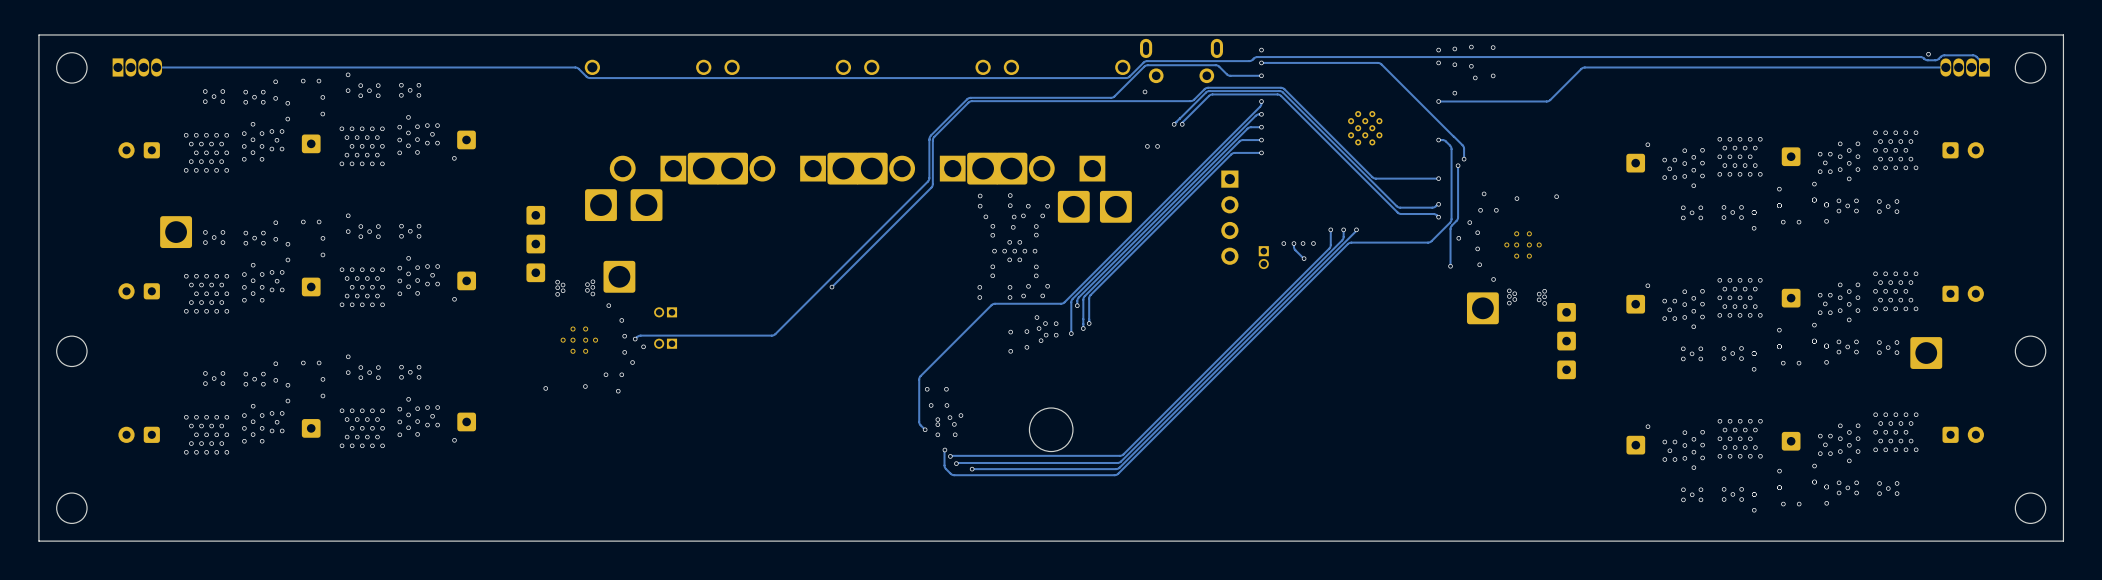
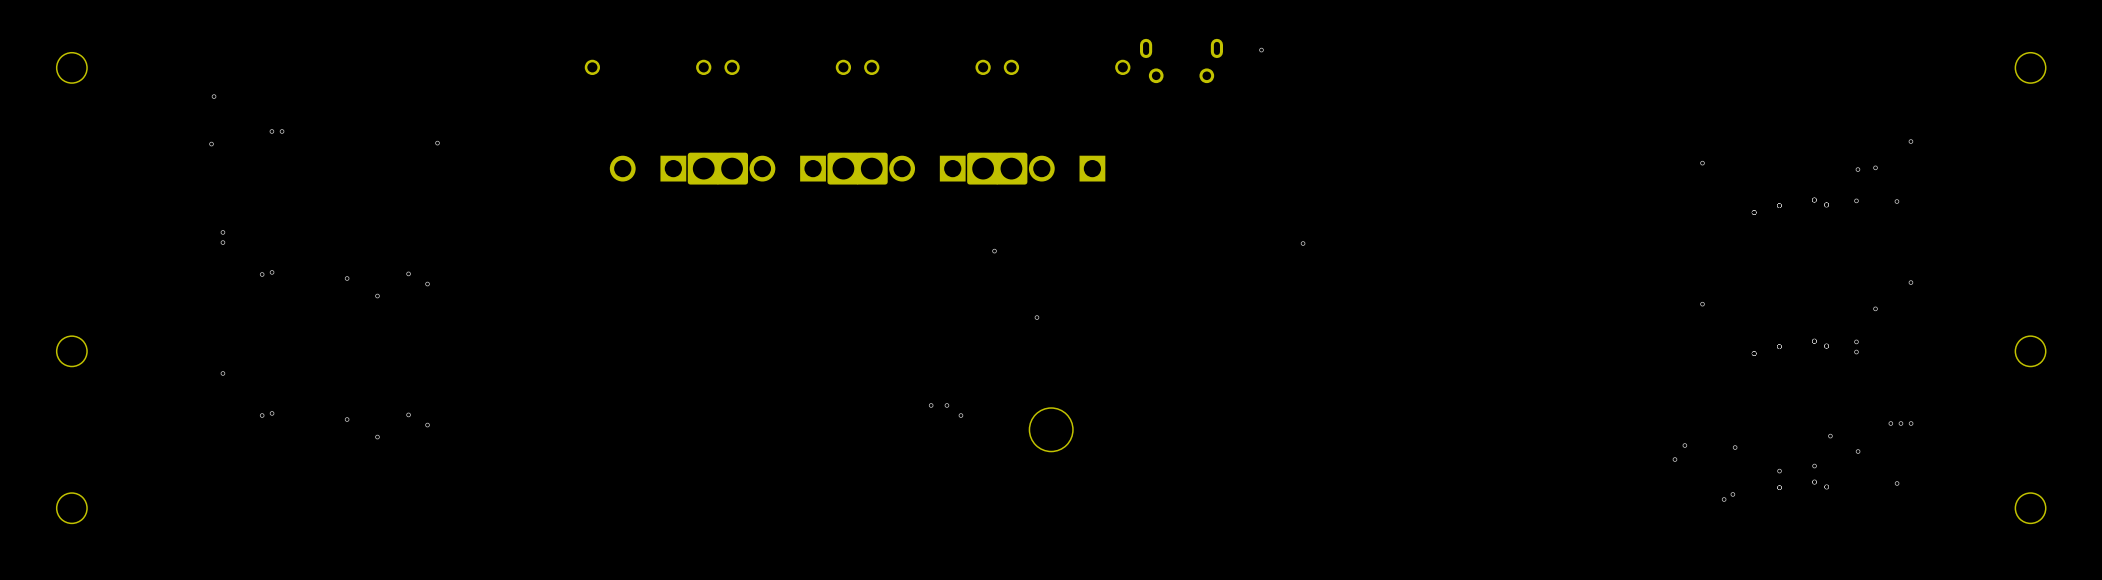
board edge: (2063, 34) (38, 34) (38, 541) (2063, 541) (2063, 34) -> none
via: (1471, 47) -> none
via: (1493, 47) -> none
via: (1454, 48) -> none
via: (1438, 50) -> none
via: (1928, 54) -> none
track: (1261, 62) (1379, 63) (1462, 145) (1464, 159) -> none
via: (1261, 62) -> none
via: (1438, 62) -> none
via: (1454, 64) -> none
via: (1471, 66) -> none
part: (137, 67) -> none
track: (1945, 67) (1584, 67) (1547, 101) (1438, 101) -> none
part: (1965, 67) -> none
track: (1984, 67) (1982, 63) (1972, 55) (1943, 55) (1935, 60) (1926, 60) (1920, 57) (1257, 57) (1249, 61) (1146, 61) (1126, 78) (590, 78) (575, 67) (156, 67) -> none
via: (348, 74) -> none
track: (1261, 75) (1229, 75) (1216, 65) (1147, 65) (1112, 97) (970, 97) (931, 135) (929, 139) -> none
via: (1261, 75) -> none
via: (1493, 75) -> none
via: (1475, 77) -> none
via: (275, 81) -> none
via: (303, 81) -> none
via: (318, 81) -> none
via: (360, 85) -> none
via: (378, 85) -> none
via: (401, 85) -> none
via: (418, 85) -> none
via: (348, 90) -> none
via: (369, 90) -> none
via: (410, 90) -> none
via: (205, 91) -> none
via: (222, 91) -> none
via: (1145, 91) -> none
via: (245, 92) -> none
via: (263, 92) -> none
via: (1454, 93) -> none
via: (360, 95) -> none
via: (378, 95) -> none
via: (401, 95) -> none
via: (418, 95) -> none
via: (254, 97) -> none
via: (322, 97) -> none
via: (275, 98) -> none
via: (205, 101) -> none
via: (222, 101) -> none
track: (1261, 101) (1260, 106) (1064, 302) (991, 305) (919, 377) (919, 422) (925, 429) -> none
via: (1261, 101) -> none
via: (1438, 101) -> none
via: (245, 102) -> none
via: (263, 102) -> none
via: (287, 103) -> none
via: (322, 114) -> none
track: (1261, 114) (1255, 115) (1072, 299) (1071, 333) -> none
via: (1261, 114) -> none
via: (408, 117) -> none
via: (287, 119) -> none
via: (253, 124) -> none
track: (1174, 124) (1208, 91) (1280, 91) (1397, 206) (1432, 207) (1437, 204) -> none
via: (1174, 124) -> none
track: (1182, 124) (1211, 94) (1279, 94) (1398, 212) (1433, 214) (1438, 217) -> none
via: (1182, 124) -> none
via: (427, 125) -> none
via: (437, 125) -> none
via: (417, 126) -> none
via: (399, 127) -> none
track: (1261, 127) (1247, 128) (1078, 297) (1077, 305) -> none
via: (1261, 127) -> none
via: (341, 128) -> none
via: (352, 128) -> none
via: (362, 128) -> none
via: (372, 128) -> none
via: (382, 128) -> none
part: (1365, 128) -> none
via: (408, 132) -> none
via: (1875, 132) -> none
via: (1885, 132) -> none
via: (1895, 132) -> none
via: (1905, 132) -> none
via: (1916, 132) -> none
via: (244, 133) -> none
via: (262, 133) -> none
via: (432, 134) -> none
via: (186, 135) -> none
via: (196, 135) -> none
via: (206, 135) -> none
via: (216, 135) -> none
via: (226, 135) -> none
via: (346, 137) -> none
via: (357, 137) -> none
via: (367, 137) -> none
via: (377, 137) -> none
via: (252, 139) -> none
via: (417, 139) -> none
part: (466, 139) -> none
track: (929, 139) (928, 181) (774, 334) (640, 335) (635, 339) -> none
via: (1719, 139) -> none
via: (1729, 139) -> none
via: (1740, 139) -> none
via: (1750, 139) -> none
via: (1760, 139) -> none
via: (276, 140) -> none
via: (399, 140) -> none
track: (1261, 140) (1239, 141) (1084, 296) (1083, 328) -> none
via: (1261, 140) -> none
track: (1438, 140) (1445, 140) (1451, 148) (1450, 222) (1429, 242) (1348, 243) (1117, 474) (953, 475) (944, 467) (944, 450) -> none
via: (1438, 140) -> none
via: (1880, 141) -> none
via: (1890, 141) -> none
via: (1900, 141) -> none
part: (311, 143) -> none
via: (427, 143) -> none
via: (1840, 143) -> none
via: (1857, 143) -> none
via: (191, 144) -> none
via: (201, 144) -> none
via: (221, 144) -> none
via: (1647, 144) -> none
via: (408, 145) -> none
via: (244, 146) -> none
via: (262, 146) -> none
via: (352, 146) -> none
via: (362, 146) -> none
via: (372, 146) -> none
via: (382, 146) -> none
via: (1147, 146) -> none
via: (1157, 146) -> none
via: (1724, 148) -> none
via: (1734, 148) -> none
via: (1745, 148) -> none
via: (1755, 148) -> none
via: (271, 149) -> none
via: (282, 149) -> none
part: (139, 150) -> none
via: (1684, 150) -> none
via: (1702, 150) -> none
via: (1849, 150) -> none
via: (1875, 150) -> none
via: (1885, 150) -> none
via: (1895, 150) -> none
via: (1905, 150) -> none
part: (1963, 150) -> none
via: (196, 152) -> none
via: (206, 152) -> none
via: (216, 152) -> none
via: (226, 152) -> none
via: (252, 152) -> none
via: (399, 152) -> none
via: (417, 152) -> none
track: (1261, 152) (1231, 154) (1090, 295) (1089, 323) -> none
via: (1261, 152) -> none
via: (1820, 154) -> none
via: (1830, 154) -> none
via: (346, 155) -> none
via: (357, 155) -> none
via: (367, 155) -> none
via: (377, 155) -> none
via: (1719, 156) -> none
via: (1729, 156) -> none
via: (1740, 156) -> none
via: (1750, 156) -> none
part: (1791, 156) -> none
via: (1840, 156) -> none
via: (1857, 156) -> none
via: (1693, 157) -> none
via: (454, 158) -> none
via: (244, 159) -> none
via: (262, 159) -> none
via: (1464, 159) -> none
via: (1880, 159) -> none
via: (1890, 159) -> none
via: (1900, 159) -> none
via: (1910, 159) -> none
via: (1664, 160) -> none
via: (1674, 160) -> none
via: (191, 161) -> none
via: (201, 161) -> none
via: (211, 161) -> none
via: (221, 161) -> none
via: (1825, 162) -> none
via: (341, 163) -> none
via: (352, 163) -> none
via: (362, 163) -> none
via: (372, 163) -> none
via: (382, 163) -> none
part: (1635, 163) -> none
via: (1684, 163) -> none
via: (1849, 163) -> none
track: (1458, 165) (1458, 217) (1450, 228) (1450, 266) -> none
via: (1458, 165) -> none
via: (1724, 165) -> none
via: (1734, 165) -> none
via: (1745, 165) -> none
via: (1755, 165) -> none
via: (1885, 167) -> none
via: (1895, 167) -> none
via: (1905, 167) -> none
via: (1916, 167) -> none
via: (1669, 168) -> none
via: (1840, 169) -> none
via: (186, 170) -> none
via: (196, 170) -> none
via: (206, 170) -> none
via: (216, 170) -> none
via: (226, 170) -> none
via: (1693, 170) -> none
via: (1820, 171) -> none
via: (1830, 171) -> none
via: (1719, 174) -> none
via: (1729, 174) -> none
via: (1740, 174) -> none
via: (1750, 174) -> none
via: (1760, 174) -> none
via: (1684, 176) -> none
via: (1702, 176) -> none
via: (1664, 177) -> none
via: (1674, 177) -> none
track: (1438, 178) (1373, 177) (1281, 87) (1207, 87) (1190, 101) (971, 101) (933, 138) (931, 187) (831, 287) -> none
via: (1438, 178) -> none
via: (1849, 178) -> none
via: (1814, 184) -> none
via: (1693, 185) -> none
via: (1779, 189) -> none
via: (1484, 193) -> none
via: (1010, 195) -> none
via: (980, 196) -> none
via: (1556, 196) -> none
via: (1516, 198) -> none
via: (1838, 200) -> none
via: (1879, 201) -> none
via: (1438, 204) -> none
part: (600, 205) -> none
part: (646, 205) -> none
via: (1010, 205) -> none
via: (1847, 205) -> none
via: (980, 206) -> none
via: (1028, 206) -> none
via: (1047, 206) -> none
part: (1073, 206) -> none
part: (1115, 206) -> none
via: (1888, 206) -> none
via: (1683, 207) -> none
via: (1700, 207) -> none
via: (1723, 207) -> none
via: (1741, 207) -> none
via: (1480, 210) -> none
via: (1496, 210) -> none
via: (1838, 211) -> none
via: (1856, 211) -> none
via: (1879, 211) -> none
via: (1896, 211) -> none
via: (1692, 212) -> none
via: (1732, 212) -> none
via: (348, 215) -> none
part: (535, 215) -> none
via: (1023, 215) -> none
via: (1042, 215) -> none
via: (985, 216) -> none
via: (1014, 216) -> none
part: (1229, 217) -> none
via: (1438, 217) -> none
via: (1683, 217) -> none
via: (1700, 217) -> none
via: (1723, 217) -> none
via: (1741, 217) -> none
via: (303, 221) -> none
via: (319, 221) -> none
via: (1826, 221) -> none
via: (275, 222) -> none
via: (1469, 222) -> none
via: (1783, 222) -> none
via: (1799, 222) -> none
via: (360, 226) -> none
via: (378, 226) -> none
via: (401, 226) -> none
via: (419, 226) -> none
via: (992, 226) -> none
via: (1036, 226) -> none
via: (1013, 227) -> none
via: (1754, 228) -> none
track: (1330, 229) (1329, 248) (1122, 455) (950, 456) -> none
via: (1330, 229) -> none
track: (1343, 229) (1342, 240) (1120, 462) (956, 463) -> none
via: (1343, 229) -> none
track: (1356, 229) (1118, 468) (972, 469) -> none
via: (1356, 229) -> none
via: (348, 231) -> none
via: (369, 231) -> none
via: (410, 231) -> none
part: (176, 232) -> none
via: (205, 232) -> none
via: (1477, 232) -> none
via: (245, 233) -> none
via: (263, 233) -> none
via: (992, 235) -> none
via: (1036, 235) -> none
via: (360, 236) -> none
via: (378, 236) -> none
via: (401, 236) -> none
via: (419, 236) -> none
via: (214, 237) -> none
via: (254, 238) -> none
via: (322, 238) -> none
via: (1458, 238) -> none
via: (275, 239) -> none
via: (205, 242) -> none
via: (1009, 242) -> none
via: (1019, 242) -> none
via: (245, 243) -> none
via: (263, 243) -> none
via: (1283, 243) -> none
track: (1293, 243) (1295, 249) (1304, 258) -> none
via: (1293, 243) -> none
via: (1313, 243) -> none
via: (287, 244) -> none
part: (535, 244) -> none
part: (1523, 244) -> none
via: (1477, 248) -> none
via: (1004, 251) -> none
via: (1014, 251) -> none
via: (1024, 251) -> none
via: (1035, 251) -> none
via: (322, 254) -> none
part: (1263, 257) -> none
via: (408, 258) -> none
via: (1304, 258) -> none
via: (287, 259) -> none
via: (1009, 259) -> none
via: (1019, 259) -> none
via: (1479, 264) -> none
via: (253, 265) -> none
via: (427, 266) -> none
via: (437, 266) -> none
via: (992, 266) -> none
via: (1036, 266) -> none
via: (1450, 266) -> none
via: (417, 267) -> none
via: (399, 268) -> none
via: (342, 269) -> none
via: (352, 269) -> none
via: (362, 269) -> none
via: (372, 269) -> none
via: (382, 269) -> none
via: (282, 272) -> none
part: (535, 272) -> none
via: (1875, 273) -> none
via: (1885, 273) -> none
via: (1895, 273) -> none
via: (1905, 273) -> none
via: (1916, 273) -> none
via: (244, 274) -> none
via: (432, 275) -> none
via: (992, 275) -> none
via: (1036, 275) -> none
via: (186, 276) -> none
via: (196, 276) -> none
via: (206, 276) -> none
via: (216, 276) -> none
via: (226, 276) -> none
part: (619, 276) -> none
via: (357, 278) -> none
via: (367, 278) -> none
via: (377, 278) -> none
via: (1493, 279) -> none
via: (253, 280) -> none
via: (399, 280) -> none
via: (417, 280) -> none
part: (466, 280) -> none
via: (1719, 280) -> none
via: (1729, 280) -> none
via: (1740, 280) -> none
via: (1750, 280) -> none
via: (1760, 280) -> none
via: (277, 281) -> none
via: (592, 281) -> none
via: (557, 282) -> none
via: (1880, 282) -> none
via: (1890, 282) -> none
via: (1900, 282) -> none
via: (437, 284) -> none
via: (563, 284) -> none
via: (587, 284) -> none
via: (1840, 284) -> none
via: (1857, 284) -> none
via: (191, 285) -> none
via: (201, 285) -> none
via: (211, 285) -> none
via: (221, 285) -> none
via: (1647, 285) -> none
part: (311, 286) -> none
via: (408, 286) -> none
via: (1028, 286) -> none
via: (1047, 286) -> none
via: (244, 287) -> none
via: (262, 287) -> none
via: (352, 287) -> none
via: (362, 287) -> none
via: (372, 287) -> none
via: (382, 287) -> none
via: (557, 287) -> none
via: (592, 287) -> none
via: (831, 287) -> none
via: (979, 287) -> none
via: (1010, 287) -> none
via: (272, 289) -> none
via: (282, 289) -> none
via: (1724, 289) -> none
via: (1734, 289) -> none
via: (1745, 289) -> none
via: (1755, 289) -> none
via: (563, 290) -> none
via: (587, 290) -> none
via: (1509, 290) -> none
part: (139, 291) -> none
via: (1544, 291) -> none
via: (1684, 291) -> none
via: (1702, 291) -> none
via: (1849, 291) -> none
via: (1875, 291) -> none
via: (1885, 291) -> none
via: (1895, 291) -> none
via: (1905, 291) -> none
via: (196, 293) -> none
via: (206, 293) -> none
via: (216, 293) -> none
via: (226, 293) -> none
via: (253, 293) -> none
via: (399, 293) -> none
via: (417, 293) -> none
via: (592, 293) -> none
via: (1514, 293) -> none
part: (1963, 293) -> none
via: (557, 294) -> none
via: (1539, 294) -> none
via: (1042, 295) -> none
via: (1820, 295) -> none
via: (1830, 295) -> none
via: (347, 296) -> none
via: (357, 296) -> none
via: (367, 296) -> none
via: (1023, 296) -> none
via: (1509, 296) -> none
via: (1544, 296) -> none
via: (979, 297) -> none
via: (1010, 297) -> none
via: (1719, 297) -> none
via: (1729, 297) -> none
via: (1740, 297) -> none
via: (1750, 297) -> none
via: (1840, 297) -> none
via: (1857, 297) -> none
via: (1693, 298) -> none
part: (1791, 298) -> none
via: (454, 299) -> none
via: (1514, 299) -> none
via: (1539, 299) -> none
via: (244, 300) -> none
via: (262, 300) -> none
via: (1880, 300) -> none
via: (1890, 300) -> none
via: (1900, 300) -> none
via: (1910, 300) -> none
via: (1664, 301) -> none
via: (1674, 301) -> none
via: (191, 302) -> none
via: (201, 302) -> none
via: (211, 302) -> none
via: (221, 302) -> none
via: (1509, 303) -> none
via: (1544, 303) -> none
via: (1825, 303) -> none
via: (342, 304) -> none
via: (352, 304) -> none
via: (362, 304) -> none
via: (372, 304) -> none
via: (382, 304) -> none
part: (1635, 304) -> none
via: (1684, 304) -> none
via: (1849, 304) -> none
via: (608, 305) -> none
via: (1077, 305) -> none
via: (1724, 306) -> none
via: (1734, 306) -> none
via: (1745, 306) -> none
via: (1755, 306) -> none
part: (1482, 308) -> none
via: (1885, 308) -> none
via: (1895, 308) -> none
via: (1905, 308) -> none
via: (1916, 308) -> none
via: (1669, 309) -> none
via: (1840, 310) -> none
via: (1857, 310) -> none
via: (186, 311) -> none
via: (196, 311) -> none
via: (206, 311) -> none
via: (216, 311) -> none
via: (226, 311) -> none
via: (1693, 311) -> none
part: (665, 312) -> none
part: (1566, 312) -> none
via: (1820, 312) -> none
via: (1830, 312) -> none
via: (1719, 315) -> none
via: (1729, 315) -> none
via: (1740, 315) -> none
via: (1750, 315) -> none
via: (1760, 315) -> none
via: (1684, 317) -> none
via: (1702, 317) -> none
via: (1664, 318) -> none
via: (1674, 318) -> none
via: (1849, 319) -> none
via: (621, 320) -> none
via: (1045, 323) -> none
via: (1056, 323) -> none
via: (1089, 323) -> none
via: (1814, 325) -> none
via: (1693, 326) -> none
via: (1039, 328) -> none
via: (1083, 328) -> none
via: (1779, 330) -> none
via: (1026, 331) -> none
via: (1010, 332) -> none
via: (1071, 333) -> none
via: (1046, 335) -> none
via: (1056, 335) -> none
via: (624, 336) -> none
via: (635, 339) -> none
part: (579, 340) -> none
via: (1041, 340) -> none
part: (1566, 341) -> none
via: (1838, 341) -> none
via: (1879, 342) -> none
via: (1896, 342) -> none
part: (665, 343) -> none
via: (643, 346) -> none
via: (1847, 346) -> none
via: (1026, 347) -> none
via: (1888, 347) -> none
via: (1683, 348) -> none
via: (1700, 348) -> none
via: (1723, 348) -> none
via: (1741, 348) -> none
via: (1010, 351) -> none
via: (624, 352) -> none
via: (1838, 352) -> none
via: (1879, 352) -> none
via: (1896, 352) -> none
via: (1692, 353) -> none
via: (1732, 353) -> none
part: (1926, 353) -> none
via: (348, 356) -> none
via: (1683, 358) -> none
via: (1700, 358) -> none
via: (1723, 358) -> none
via: (1741, 358) -> none
via: (303, 362) -> none
via: (319, 362) -> none
via: (632, 362) -> none
via: (1826, 362) -> none
via: (275, 363) -> none
via: (1783, 363) -> none
via: (1799, 363) -> none
via: (360, 367) -> none
via: (378, 367) -> none
via: (401, 367) -> none
via: (419, 367) -> none
part: (1566, 369) -> none
via: (1754, 369) -> none
via: (348, 372) -> none
via: (369, 372) -> none
via: (410, 372) -> none
via: (205, 373) -> none
via: (245, 374) -> none
via: (263, 374) -> none
via: (606, 374) -> none
via: (621, 374) -> none
via: (360, 377) -> none
via: (378, 377) -> none
via: (401, 377) -> none
via: (419, 377) -> none
via: (214, 378) -> none
via: (254, 379) -> none
via: (322, 379) -> none
via: (275, 380) -> none
via: (205, 383) -> none
via: (222, 383) -> none
via: (245, 384) -> none
via: (263, 384) -> none
via: (287, 385) -> none
via: (585, 386) -> none
via: (545, 388) -> none
via: (927, 389) -> none
via: (946, 389) -> none
via: (618, 391) -> none
via: (322, 395) -> none
via: (408, 399) -> none
via: (287, 401) -> none
via: (253, 406) -> none
via: (427, 407) -> none
via: (437, 407) -> none
via: (417, 408) -> none
via: (399, 409) -> none
via: (342, 410) -> none
via: (352, 410) -> none
via: (362, 410) -> none
via: (372, 410) -> none
via: (382, 410) -> none
via: (282, 413) -> none
via: (1875, 414) -> none
via: (1885, 414) -> none
via: (1895, 414) -> none
via: (1906, 414) -> none
via: (1916, 414) -> none
via: (244, 415) -> none
via: (432, 416) -> none
via: (186, 417) -> none
via: (196, 417) -> none
via: (206, 417) -> none
via: (216, 417) -> none
via: (226, 417) -> none
via: (949, 417) -> none
via: (357, 419) -> none
via: (367, 419) -> none
via: (377, 419) -> none
via: (937, 419) -> none
via: (253, 421) -> none
via: (399, 421) -> none
via: (417, 421) -> none
part: (466, 421) -> none
via: (1719, 421) -> none
via: (1730, 421) -> none
via: (1740, 421) -> none
via: (1750, 421) -> none
via: (1760, 421) -> none
via: (277, 422) -> none
via: (1880, 423) -> none
via: (937, 424) -> none
via: (954, 424) -> none
via: (437, 425) -> none
via: (1840, 425) -> none
via: (1858, 425) -> none
via: (191, 426) -> none
via: (201, 426) -> none
via: (211, 426) -> none
via: (221, 426) -> none
via: (1647, 426) -> none
via: (408, 427) -> none
via: (244, 428) -> none
via: (262, 428) -> none
part: (311, 428) -> none
via: (352, 428) -> none
via: (362, 428) -> none
via: (372, 428) -> none
via: (382, 428) -> none
via: (925, 429) -> none
via: (272, 430) -> none
via: (282, 430) -> none
via: (1725, 430) -> none
via: (1735, 430) -> none
via: (1745, 430) -> none
via: (1755, 430) -> none
via: (1684, 432) -> none
via: (1702, 432) -> none
via: (1849, 432) -> none
via: (1875, 432) -> none
via: (1885, 432) -> none
via: (1895, 432) -> none
via: (1906, 432) -> none
part: (139, 434) -> none
via: (196, 434) -> none
via: (206, 434) -> none
via: (216, 434) -> none
via: (226, 434) -> none
via: (253, 434) -> none
via: (399, 434) -> none
via: (417, 434) -> none
via: (937, 434) -> none
via: (955, 434) -> none
part: (1963, 434) -> none
via: (1820, 436) -> none
via: (347, 437) -> none
via: (357, 437) -> none
via: (367, 437) -> none
via: (1719, 438) -> none
via: (1730, 438) -> none
via: (1740, 438) -> none
via: (1750, 438) -> none
via: (1840, 438) -> none
via: (1858, 438) -> none
via: (1693, 439) -> none
via: (454, 440) -> none
via: (244, 441) -> none
via: (262, 441) -> none
part: (1791, 441) -> none
via: (1880, 441) -> none
via: (1890, 441) -> none
via: (1900, 441) -> none
via: (1911, 441) -> none
via: (1664, 442) -> none
via: (1674, 442) -> none
via: (191, 443) -> none
via: (201, 443) -> none
via: (211, 443) -> none
via: (221, 443) -> none
via: (1825, 444) -> none
via: (342, 445) -> none
via: (352, 445) -> none
via: (362, 445) -> none
via: (372, 445) -> none
via: (382, 445) -> none
part: (1635, 445) -> none
via: (1702, 445) -> none
via: (1849, 445) -> none
via: (1725, 447) -> none
via: (1745, 447) -> none
via: (1755, 447) -> none
via: (1875, 449) -> none
via: (1885, 449) -> none
via: (1895, 449) -> none
via: (1906, 449) -> none
via: (1916, 449) -> none
via: (944, 450) -> none
via: (1669, 450) -> none
via: (1840, 451) -> none
via: (186, 452) -> none
via: (196, 452) -> none
via: (206, 452) -> none
via: (216, 452) -> none
via: (226, 452) -> none
via: (1693, 452) -> none
via: (1820, 453) -> none
via: (1830, 453) -> none
via: (950, 456) -> none
via: (1719, 456) -> none
via: (1730, 456) -> none
via: (1740, 456) -> none
via: (1750, 456) -> none
via: (1760, 456) -> none
via: (1702, 457) -> none
via: (1684, 458) -> none
via: (1664, 459) -> none
via: (1849, 460) -> none
via: (956, 463) -> none
via: (1693, 467) -> none
via: (972, 469) -> none
via: (1839, 482) -> none
via: (1856, 482) -> none
via: (1879, 483) -> none
via: (1847, 487) -> none
via: (1888, 488) -> none
via: (1683, 489) -> none
via: (1700, 489) -> none
via: (1724, 489) -> none
via: (1741, 489) -> none
via: (1839, 492) -> none
via: (1856, 492) -> none
via: (1879, 493) -> none
via: (1897, 493) -> none
via: (1692, 494) -> none
via: (1754, 494) -> none
via: (1754, 494) -> none
via: (1683, 499) -> none
via: (1700, 499) -> none
via: (1741, 499) -> none
via: (1826, 503) -> none
via: (1783, 504) -> none
via: (1799, 504) -> none
via: (1754, 510) -> none

